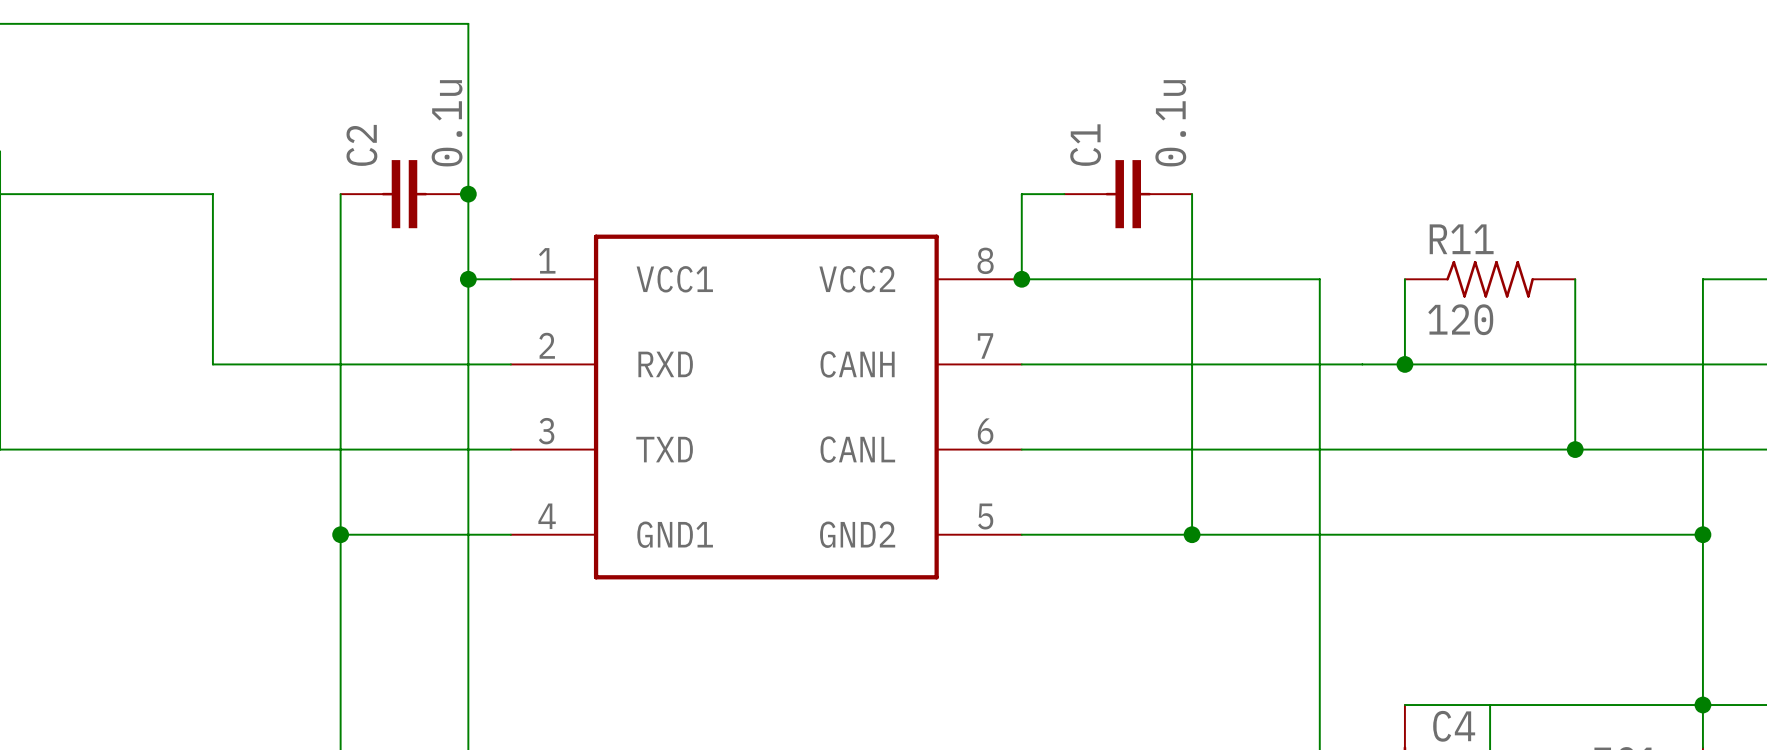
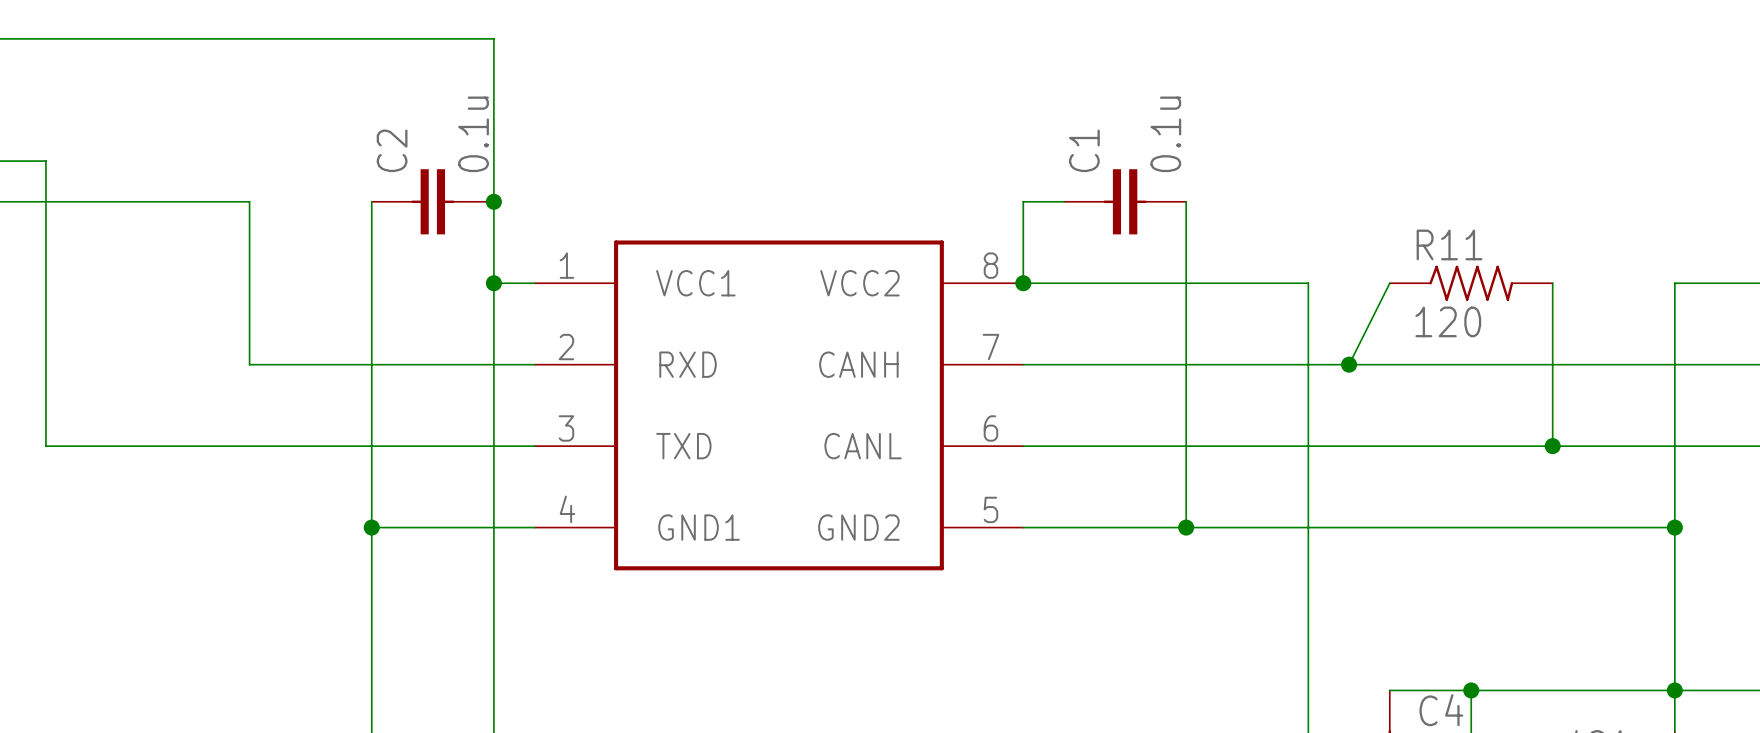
wire: (1404, 279) (1404, 364) -> (1389, 283) (1349, 364)
junction position: (1404, 364) -> (1349, 364)
junction: none -> (1471, 690)

